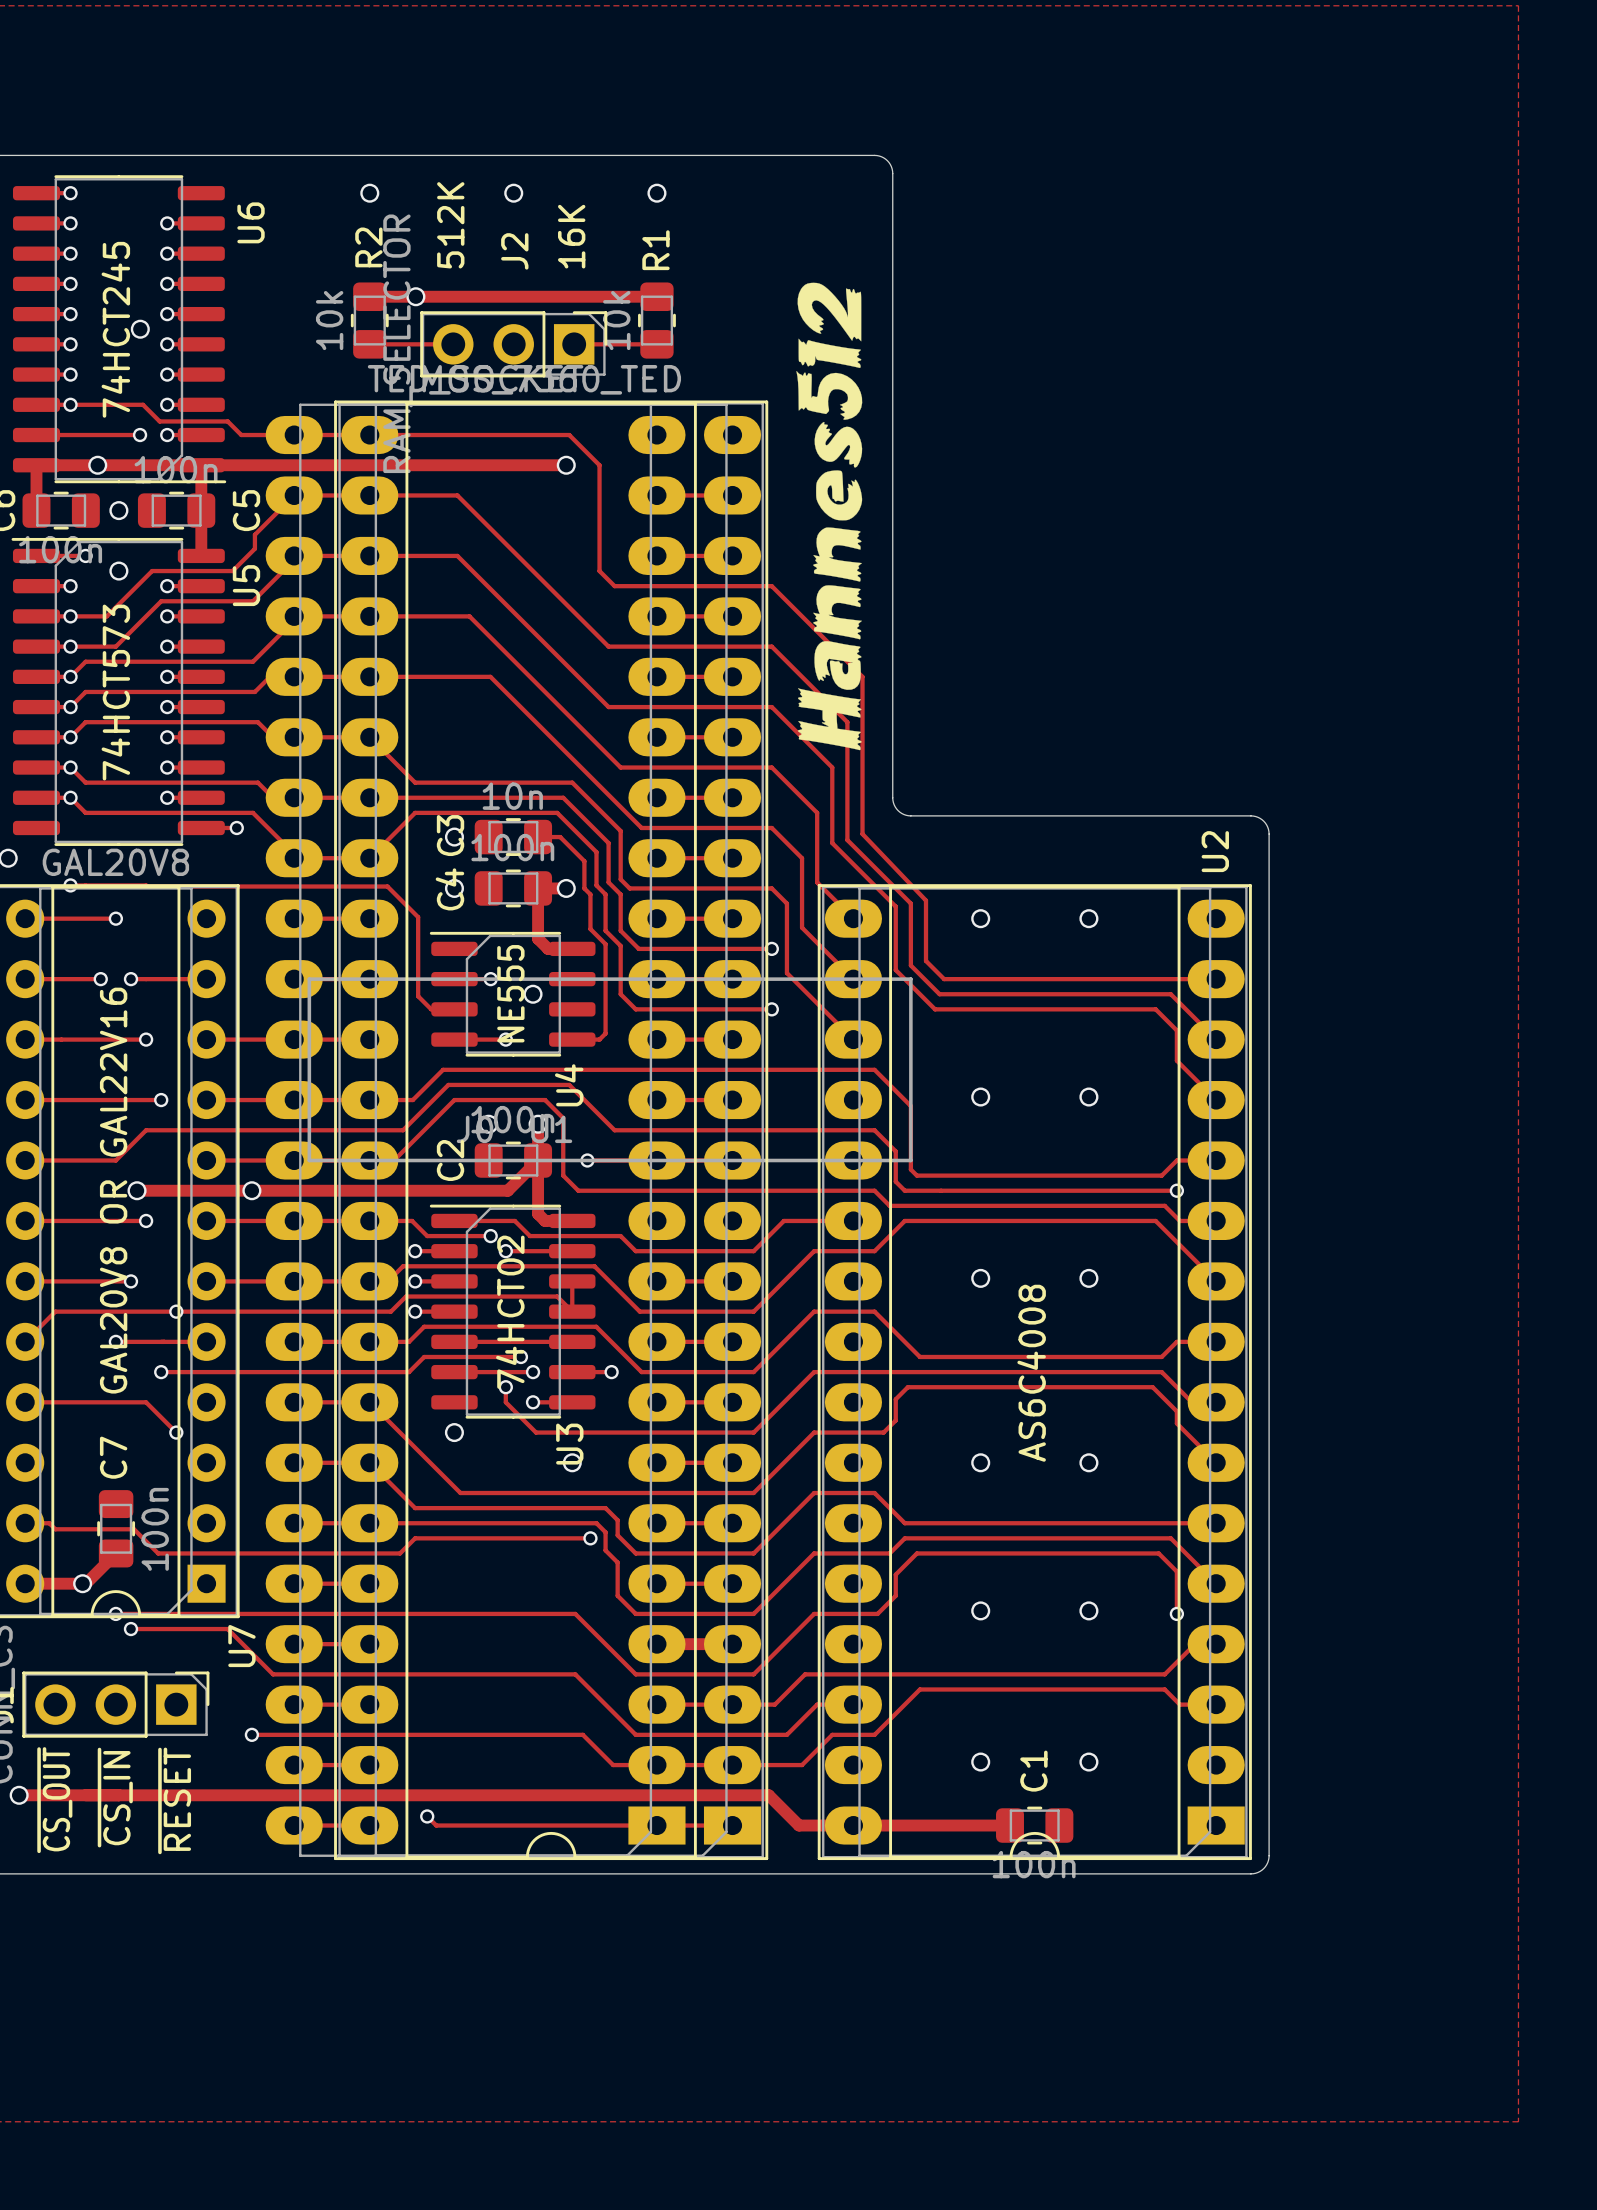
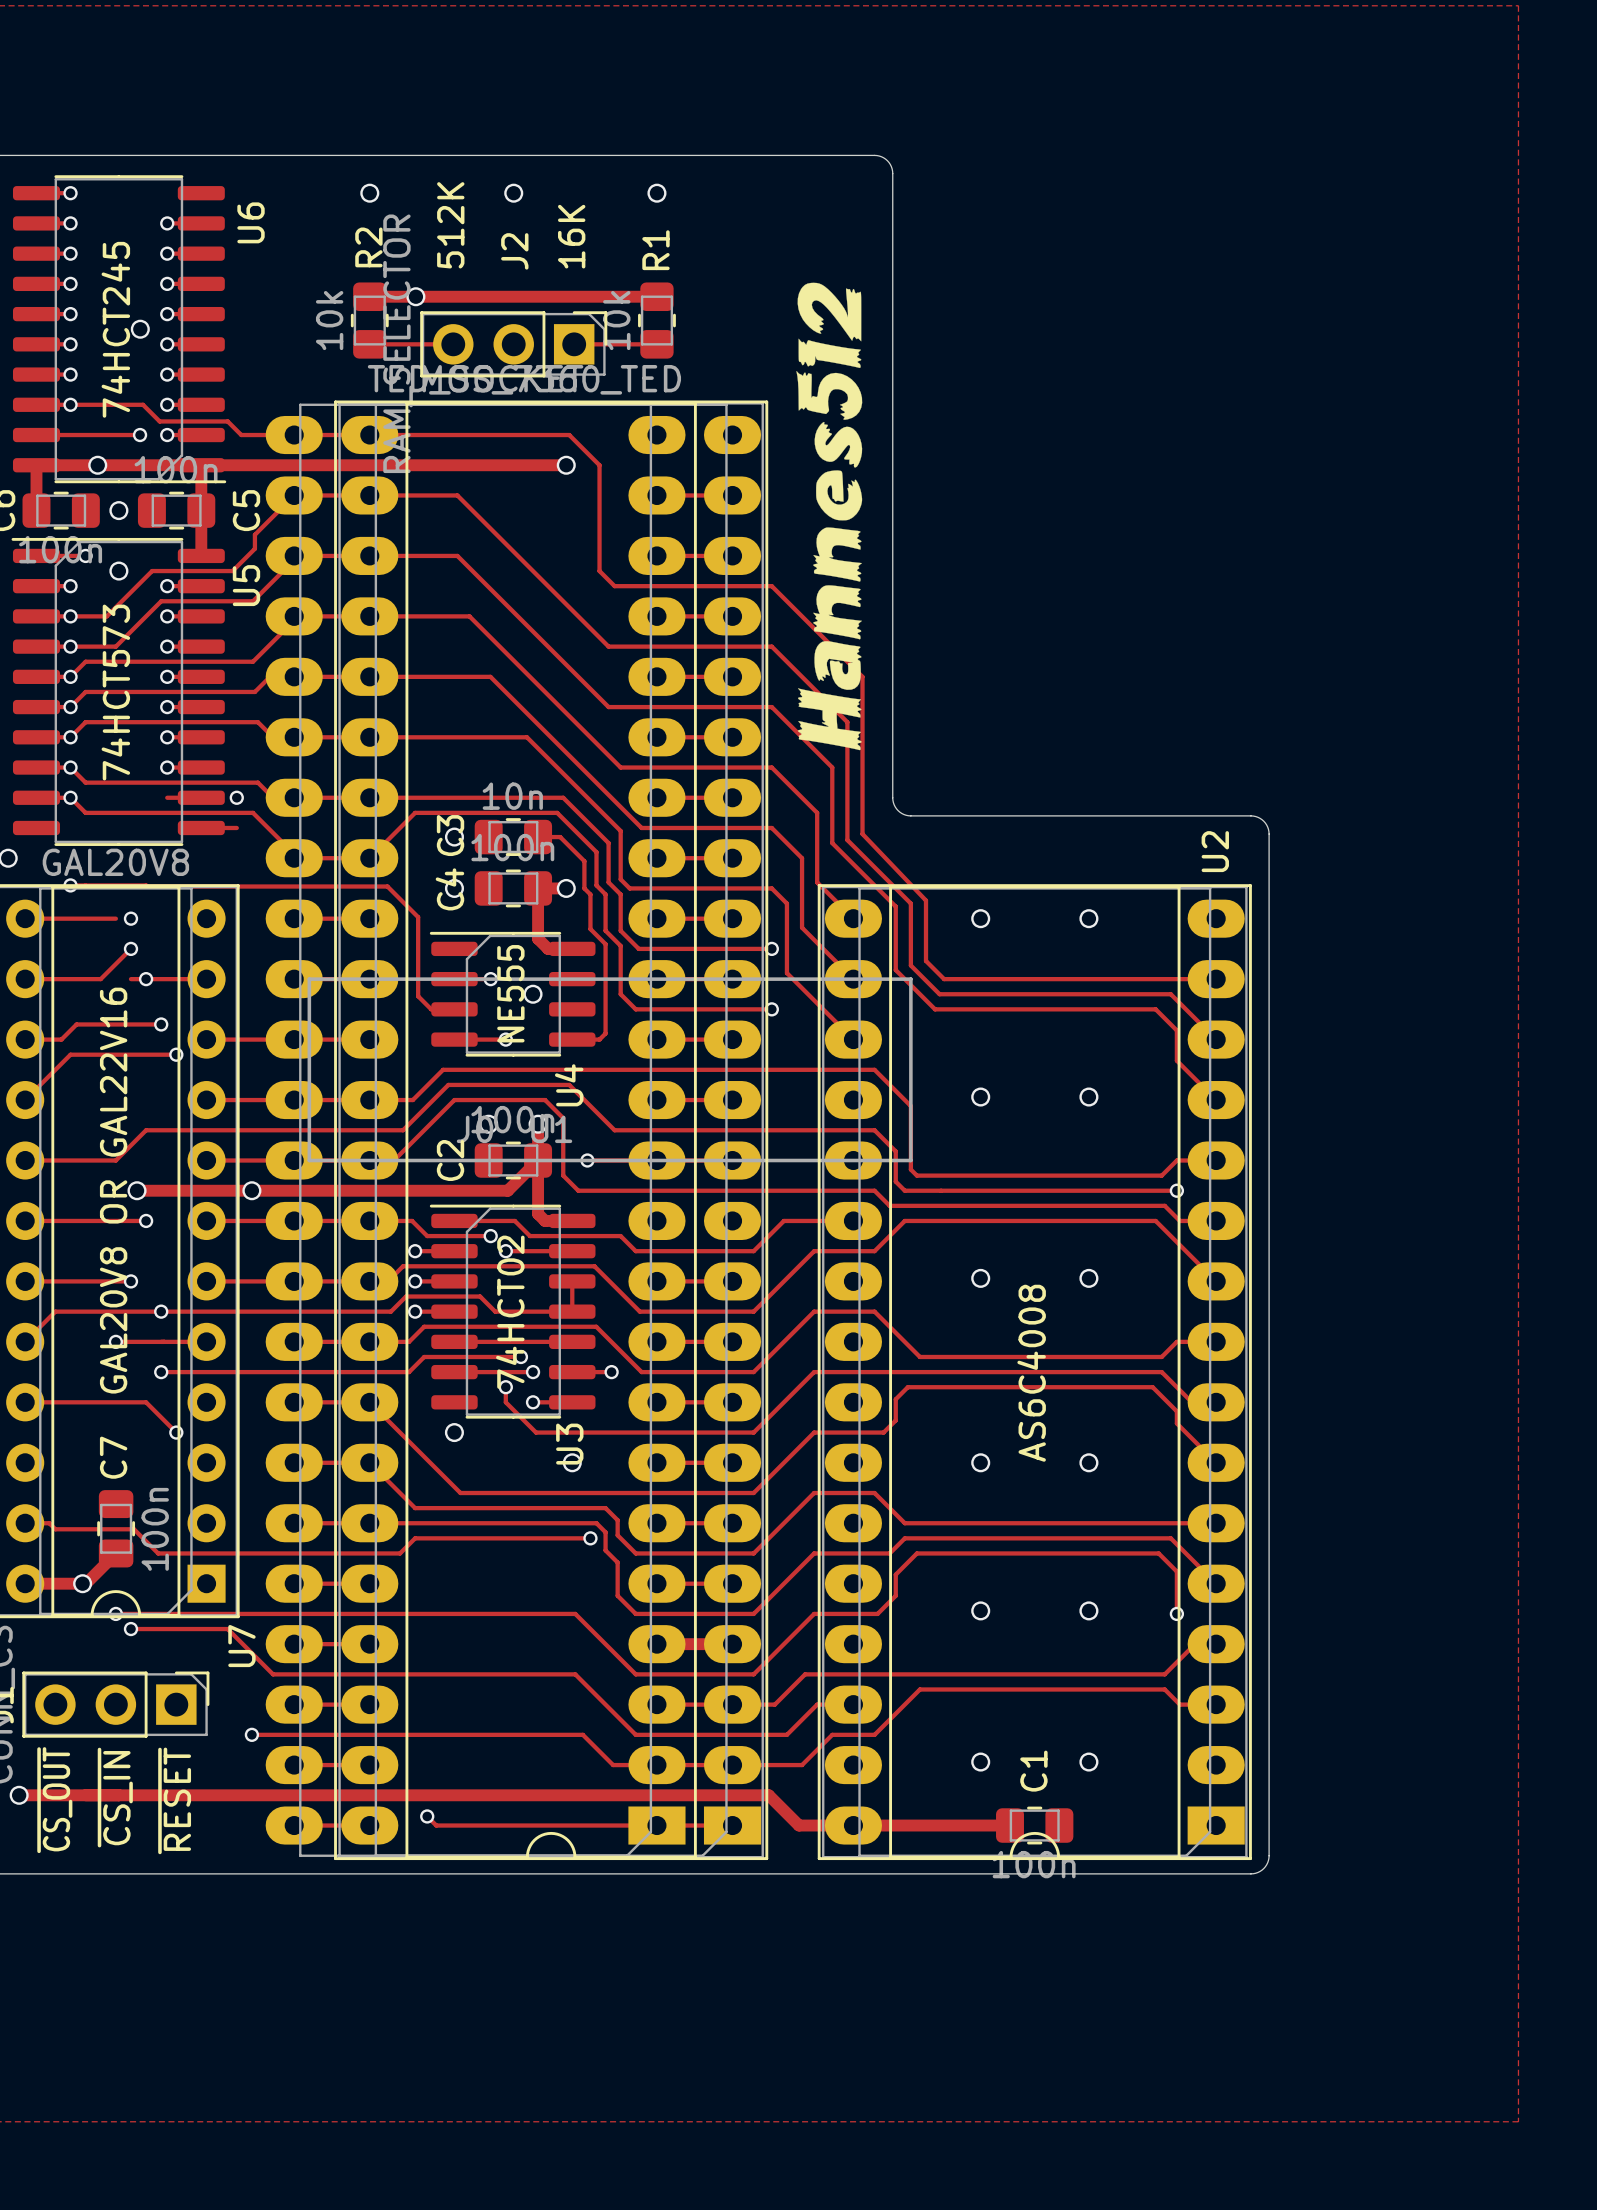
track: (369, 737) (415, 782) (572, 782) -> (369, 737) (526, 737) (572, 782)
via: (167, 797) -> none
via position: (236, 827) -> (236, 797)
via position: (115, 918) -> (130, 918)
track: none -> (130, 948) (100, 979)
via: none -> (130, 948)
via: (100, 979) -> none
via: (130, 979) -> none
via: none -> (146, 979)
via: none -> (161, 1024)
track: (61, 1039) (146, 1039) -> (61, 1039) (76, 1024) (161, 1024)
via: (146, 1039) -> none
via: none -> (176, 1054)
track: (25, 1100) (161, 1100) -> (25, 1100) (70, 1054) (176, 1054)
via: (161, 1100) -> none
track: (480, 1296) (557, 1296) (572, 1311) -> (480, 1296) (495, 1311) (572, 1311)
via position: (176, 1311) -> (161, 1311)

